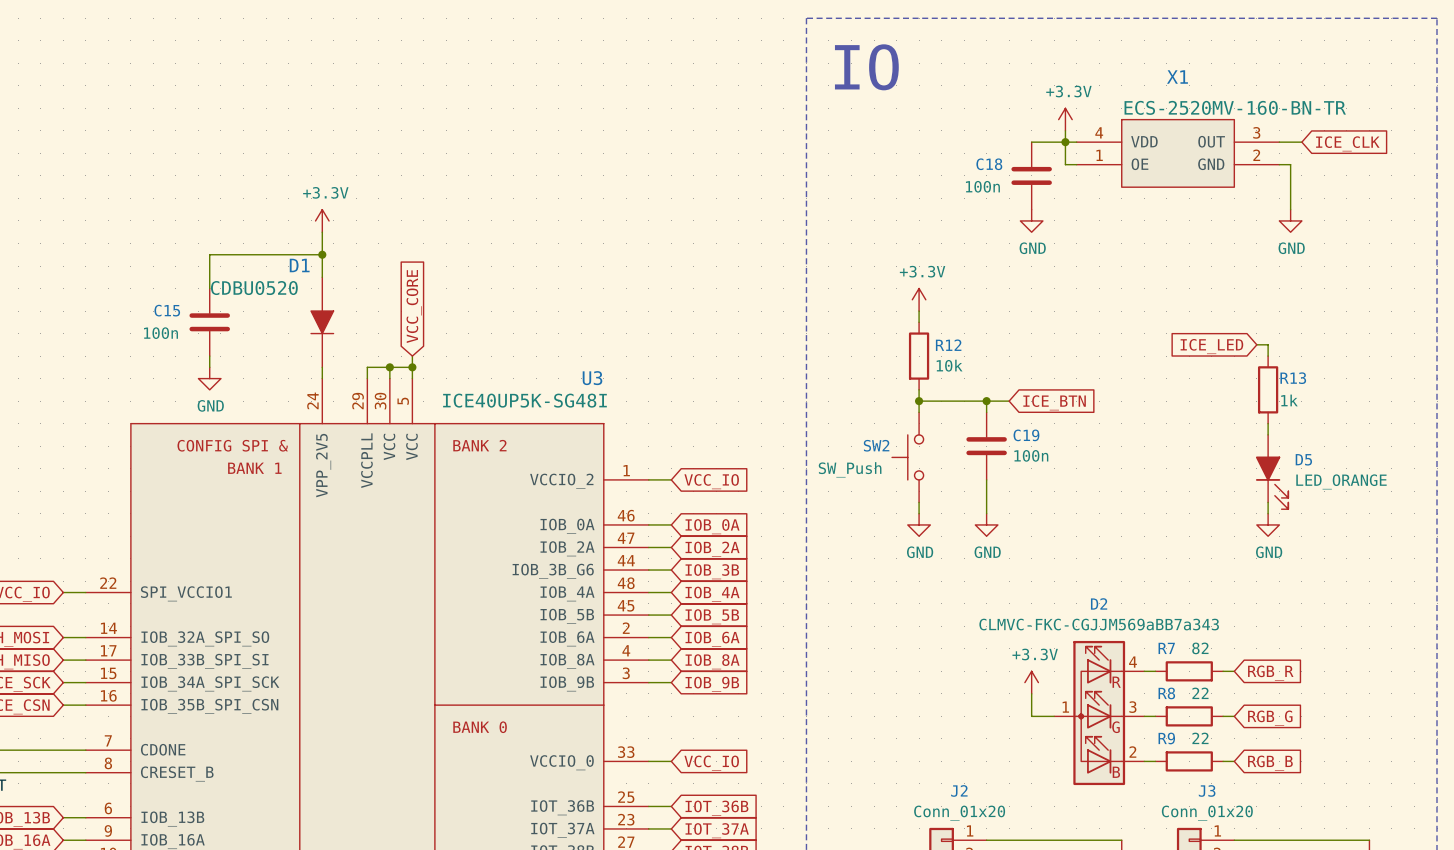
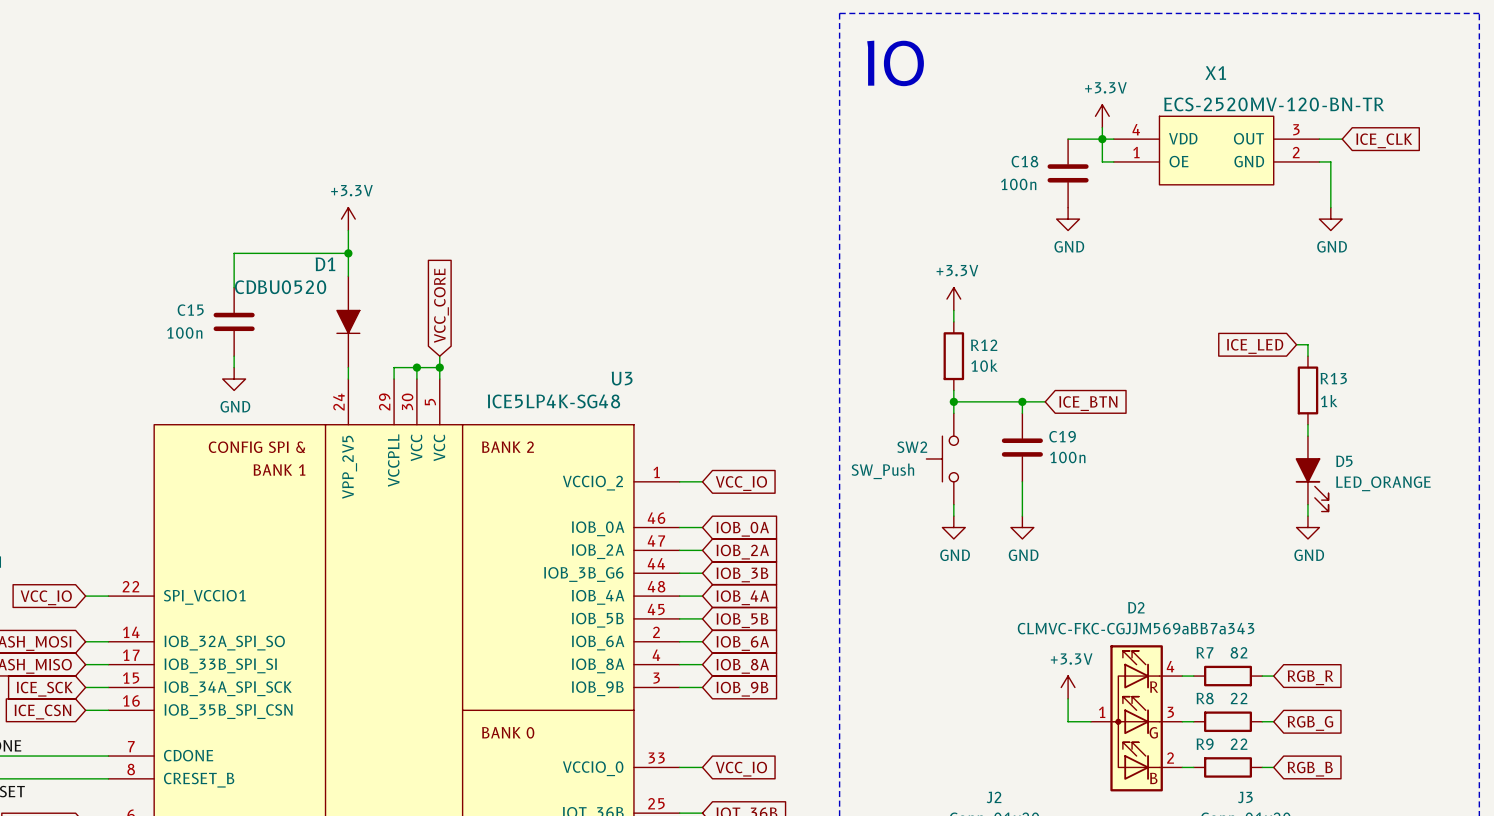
X1 value: ECS-2520MV-160-BN-TR (1235, 107) -> ECS-2520MV-120-BN-TR (1274, 104)
U3 value: ICE40UP5K-SG48I (524, 400) -> ICE5LP4K-SG48 (553, 401)

